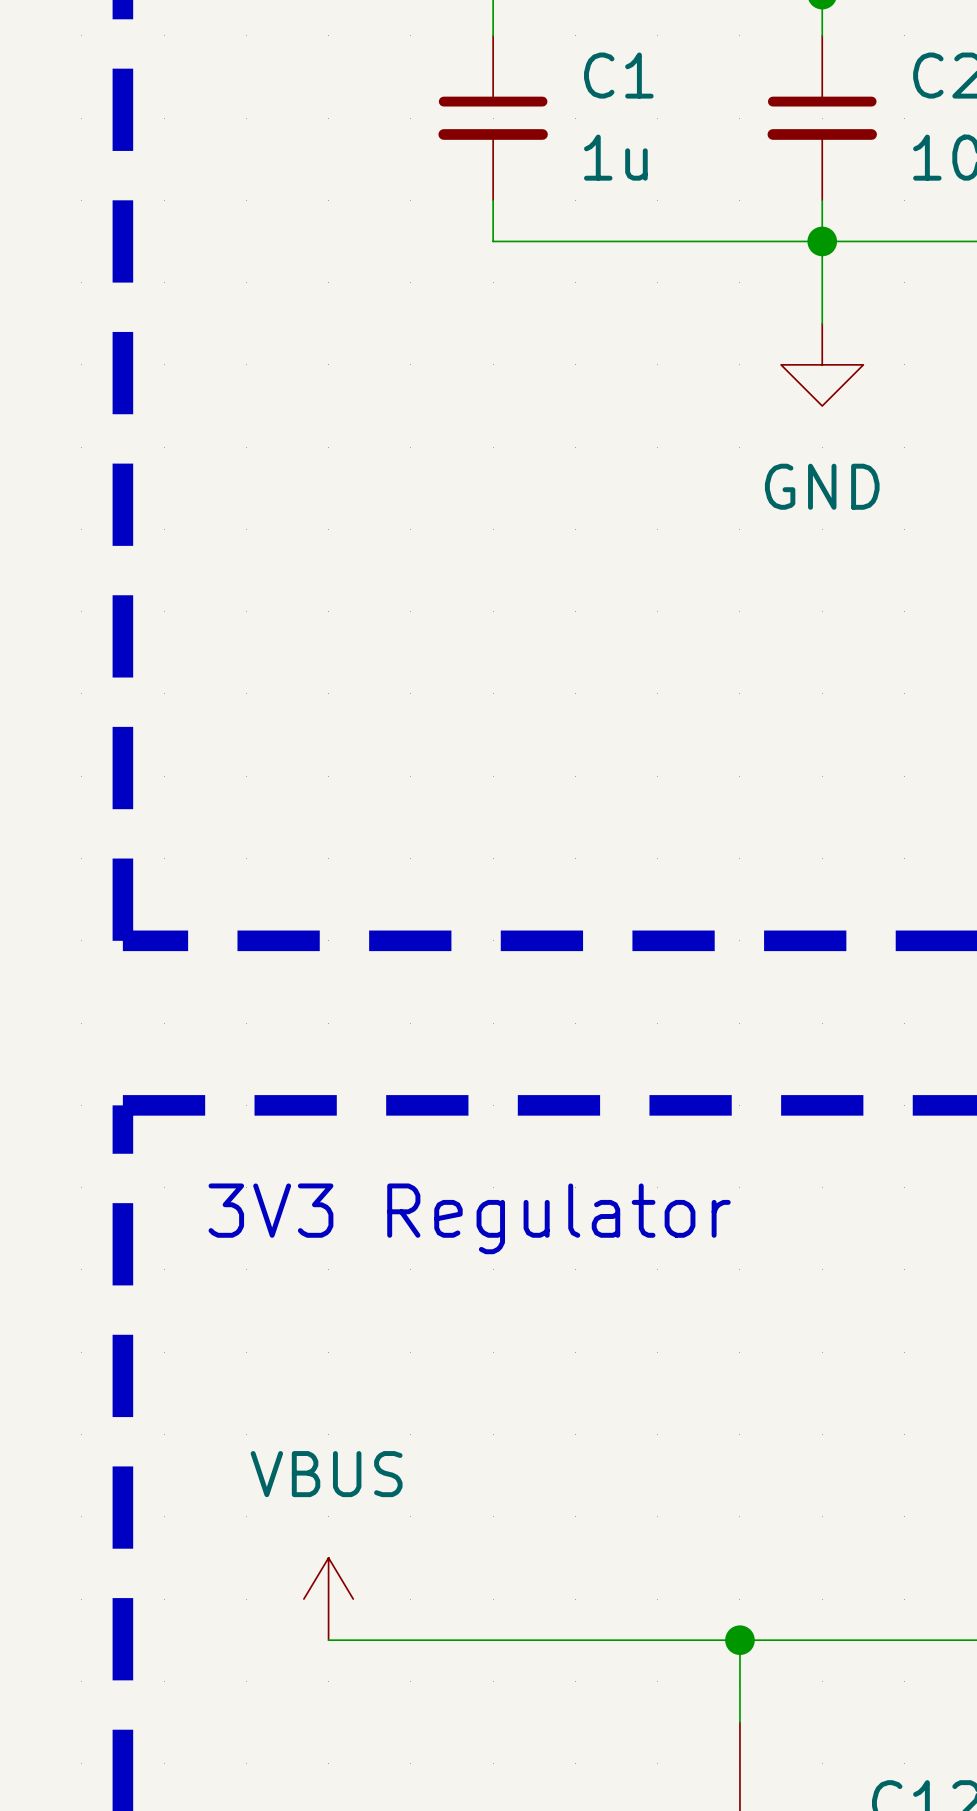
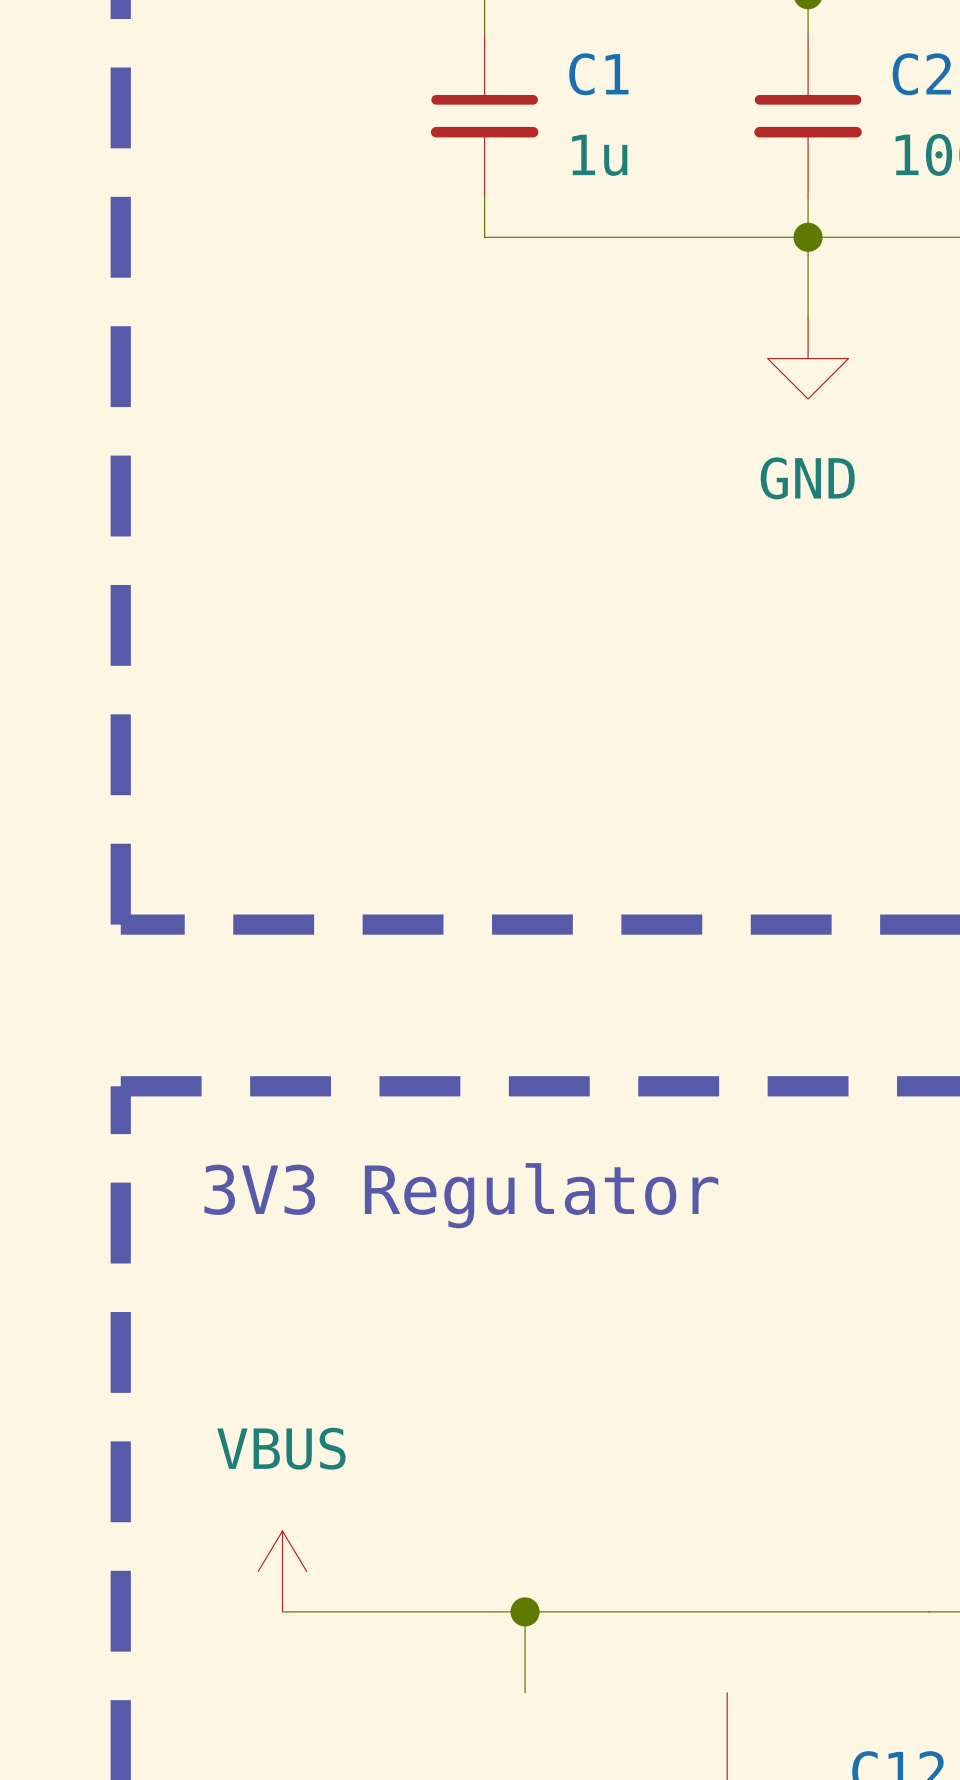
power symbol position: VBUS (328, 1599) -> VBUS (282, 1571)
wire: none -> (282, 1611) (322, 1611)
junction: none -> (525, 1611)
wire: (739, 1640) (739, 1722) -> (525, 1611) (525, 1692)
junction: (739, 1640) -> none

